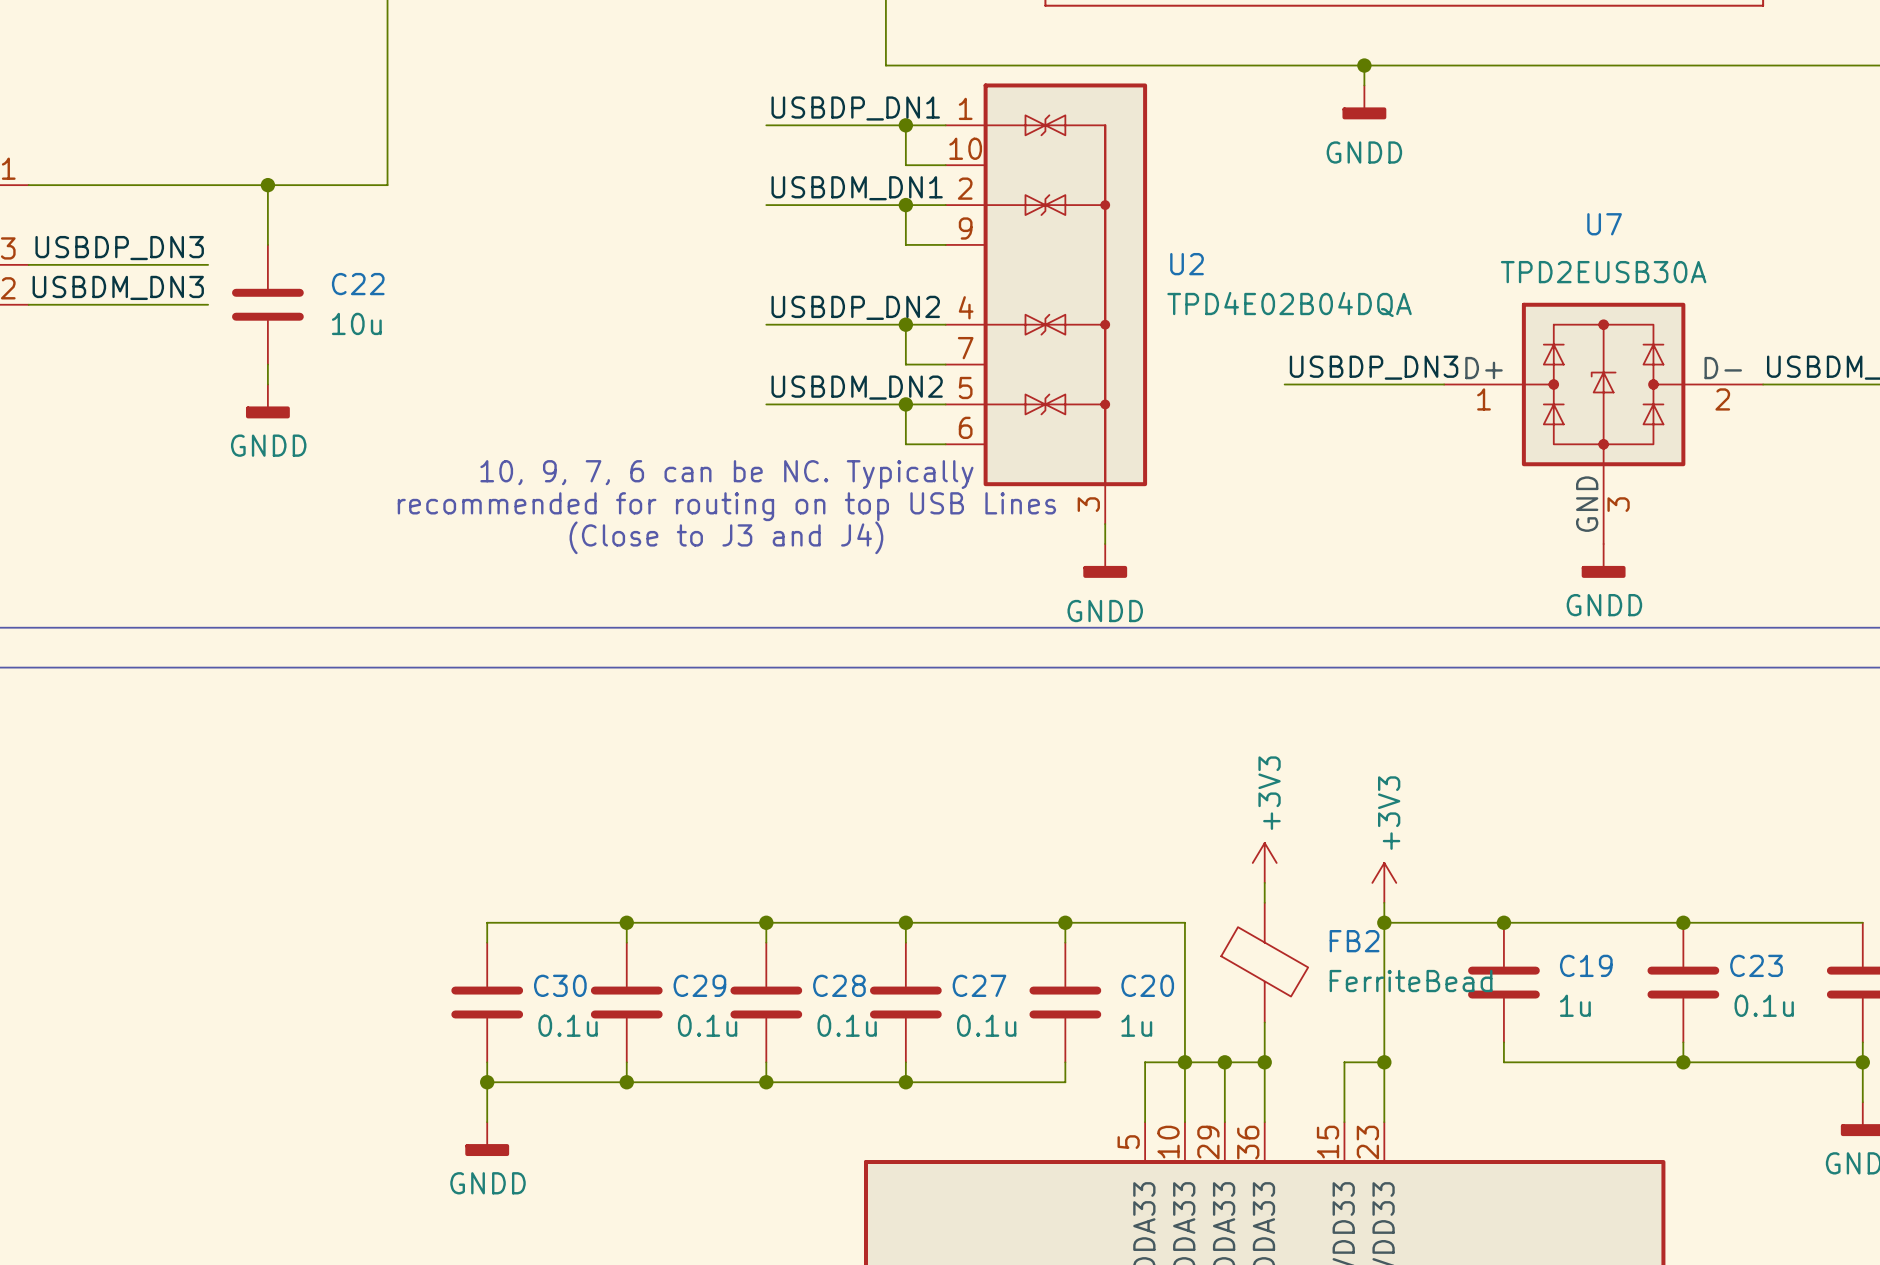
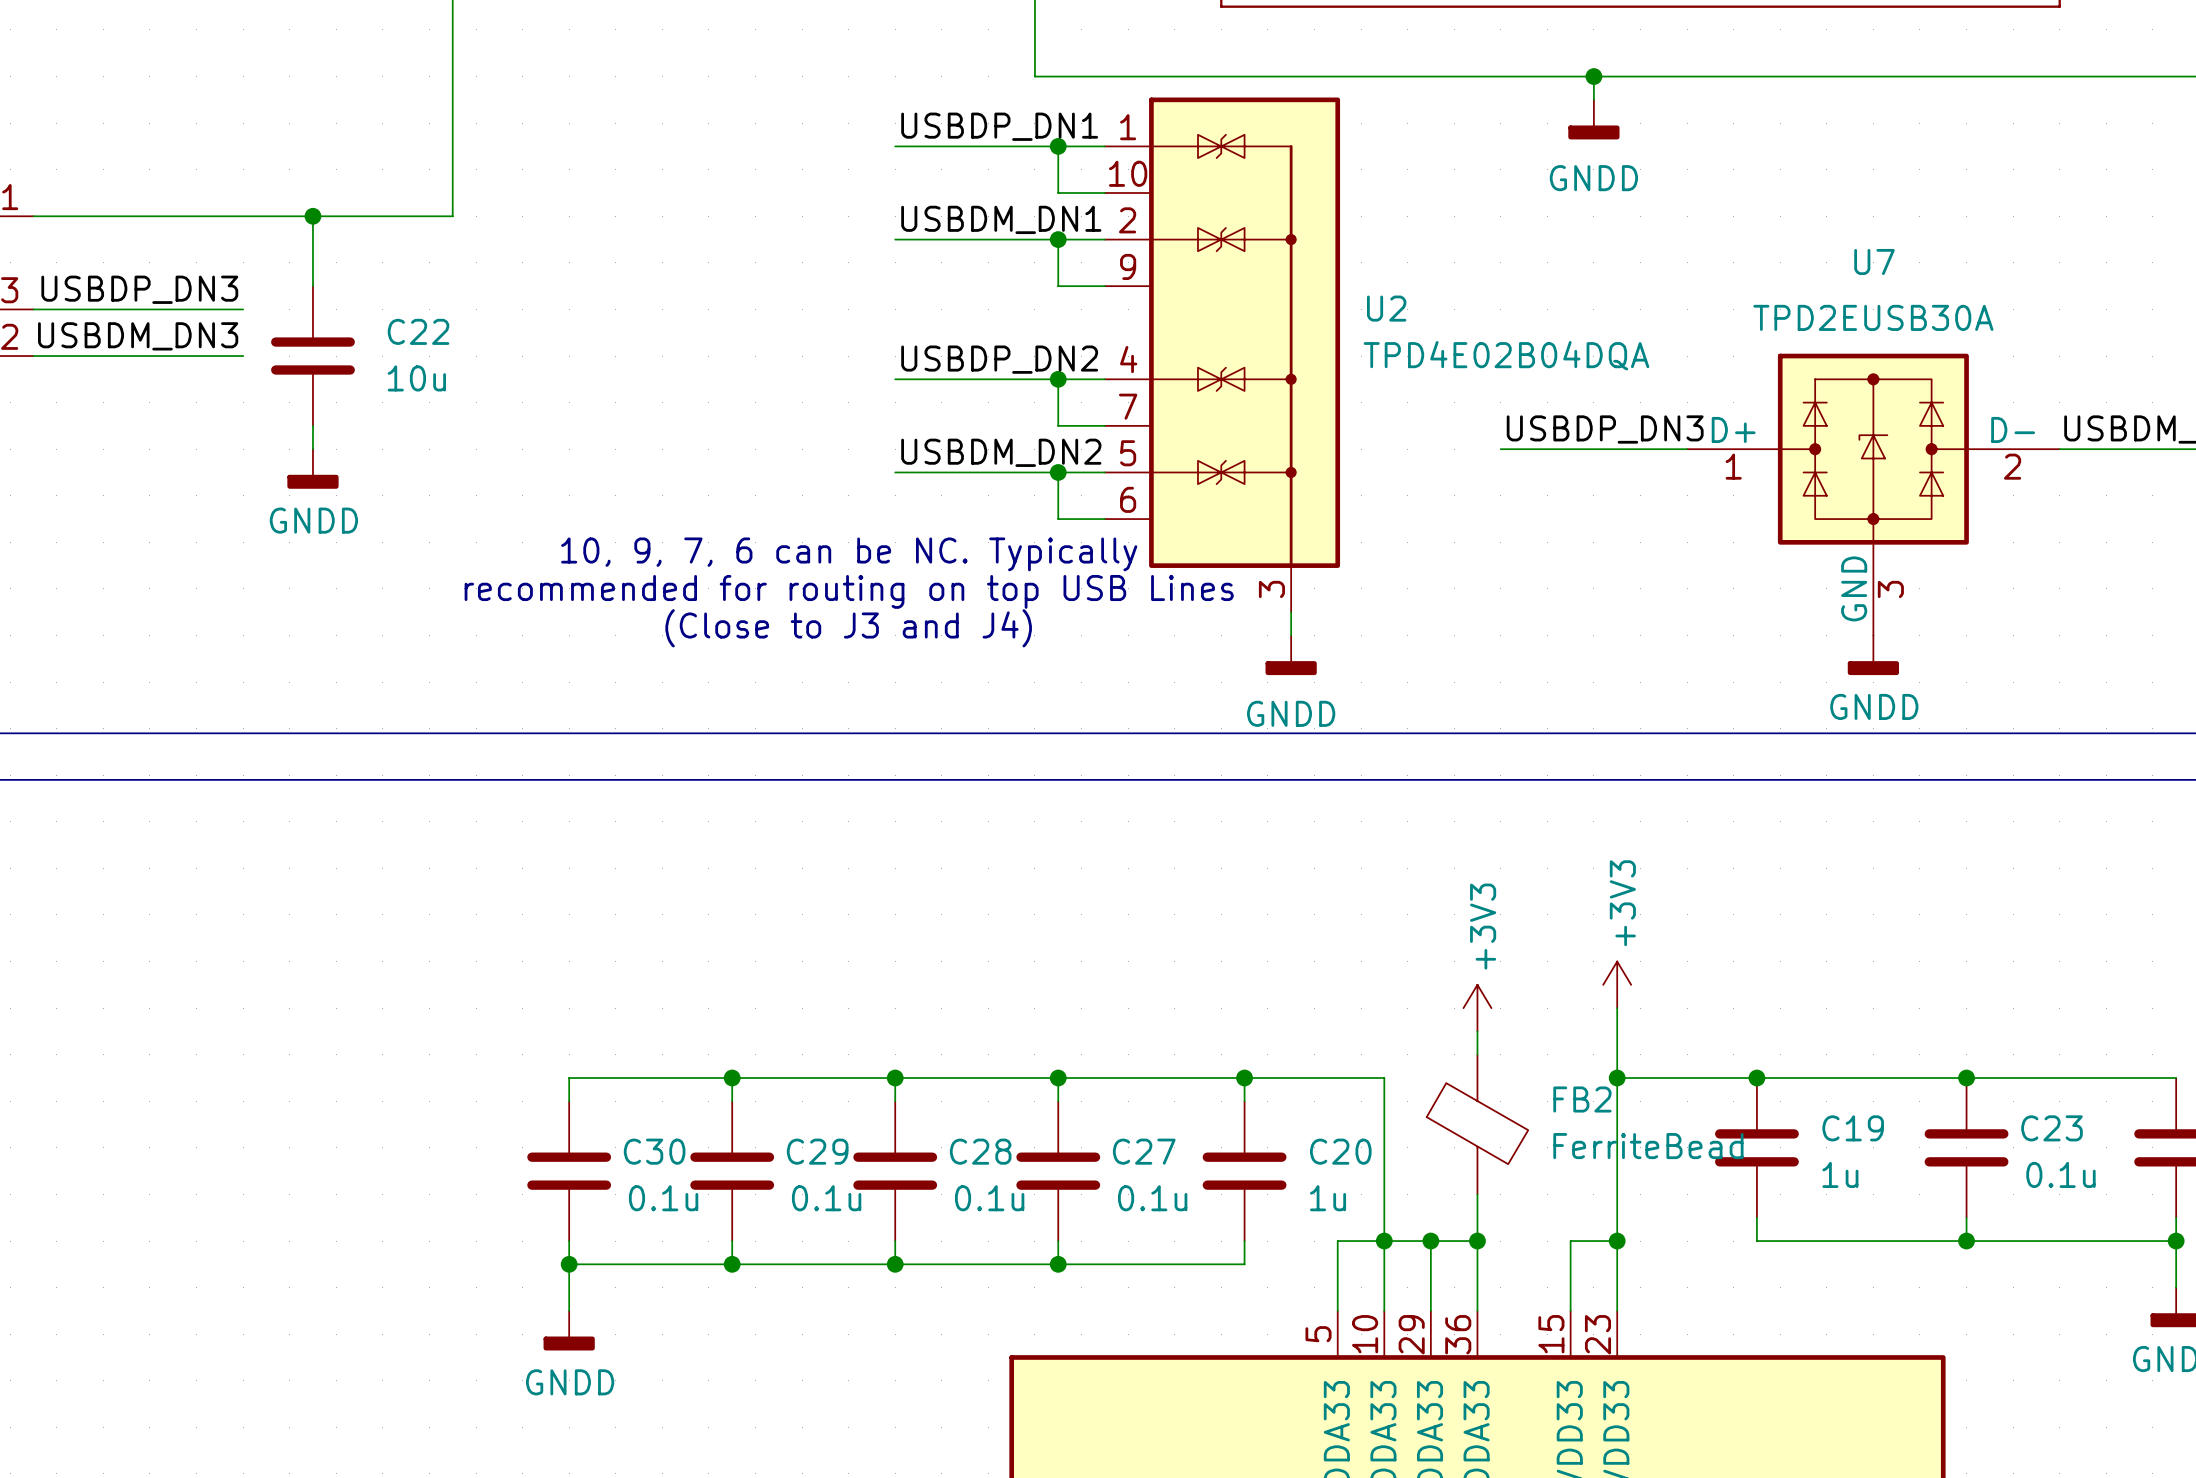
power symbol position: +3V3 (1384, 882) -> +3V3 (1617, 984)

